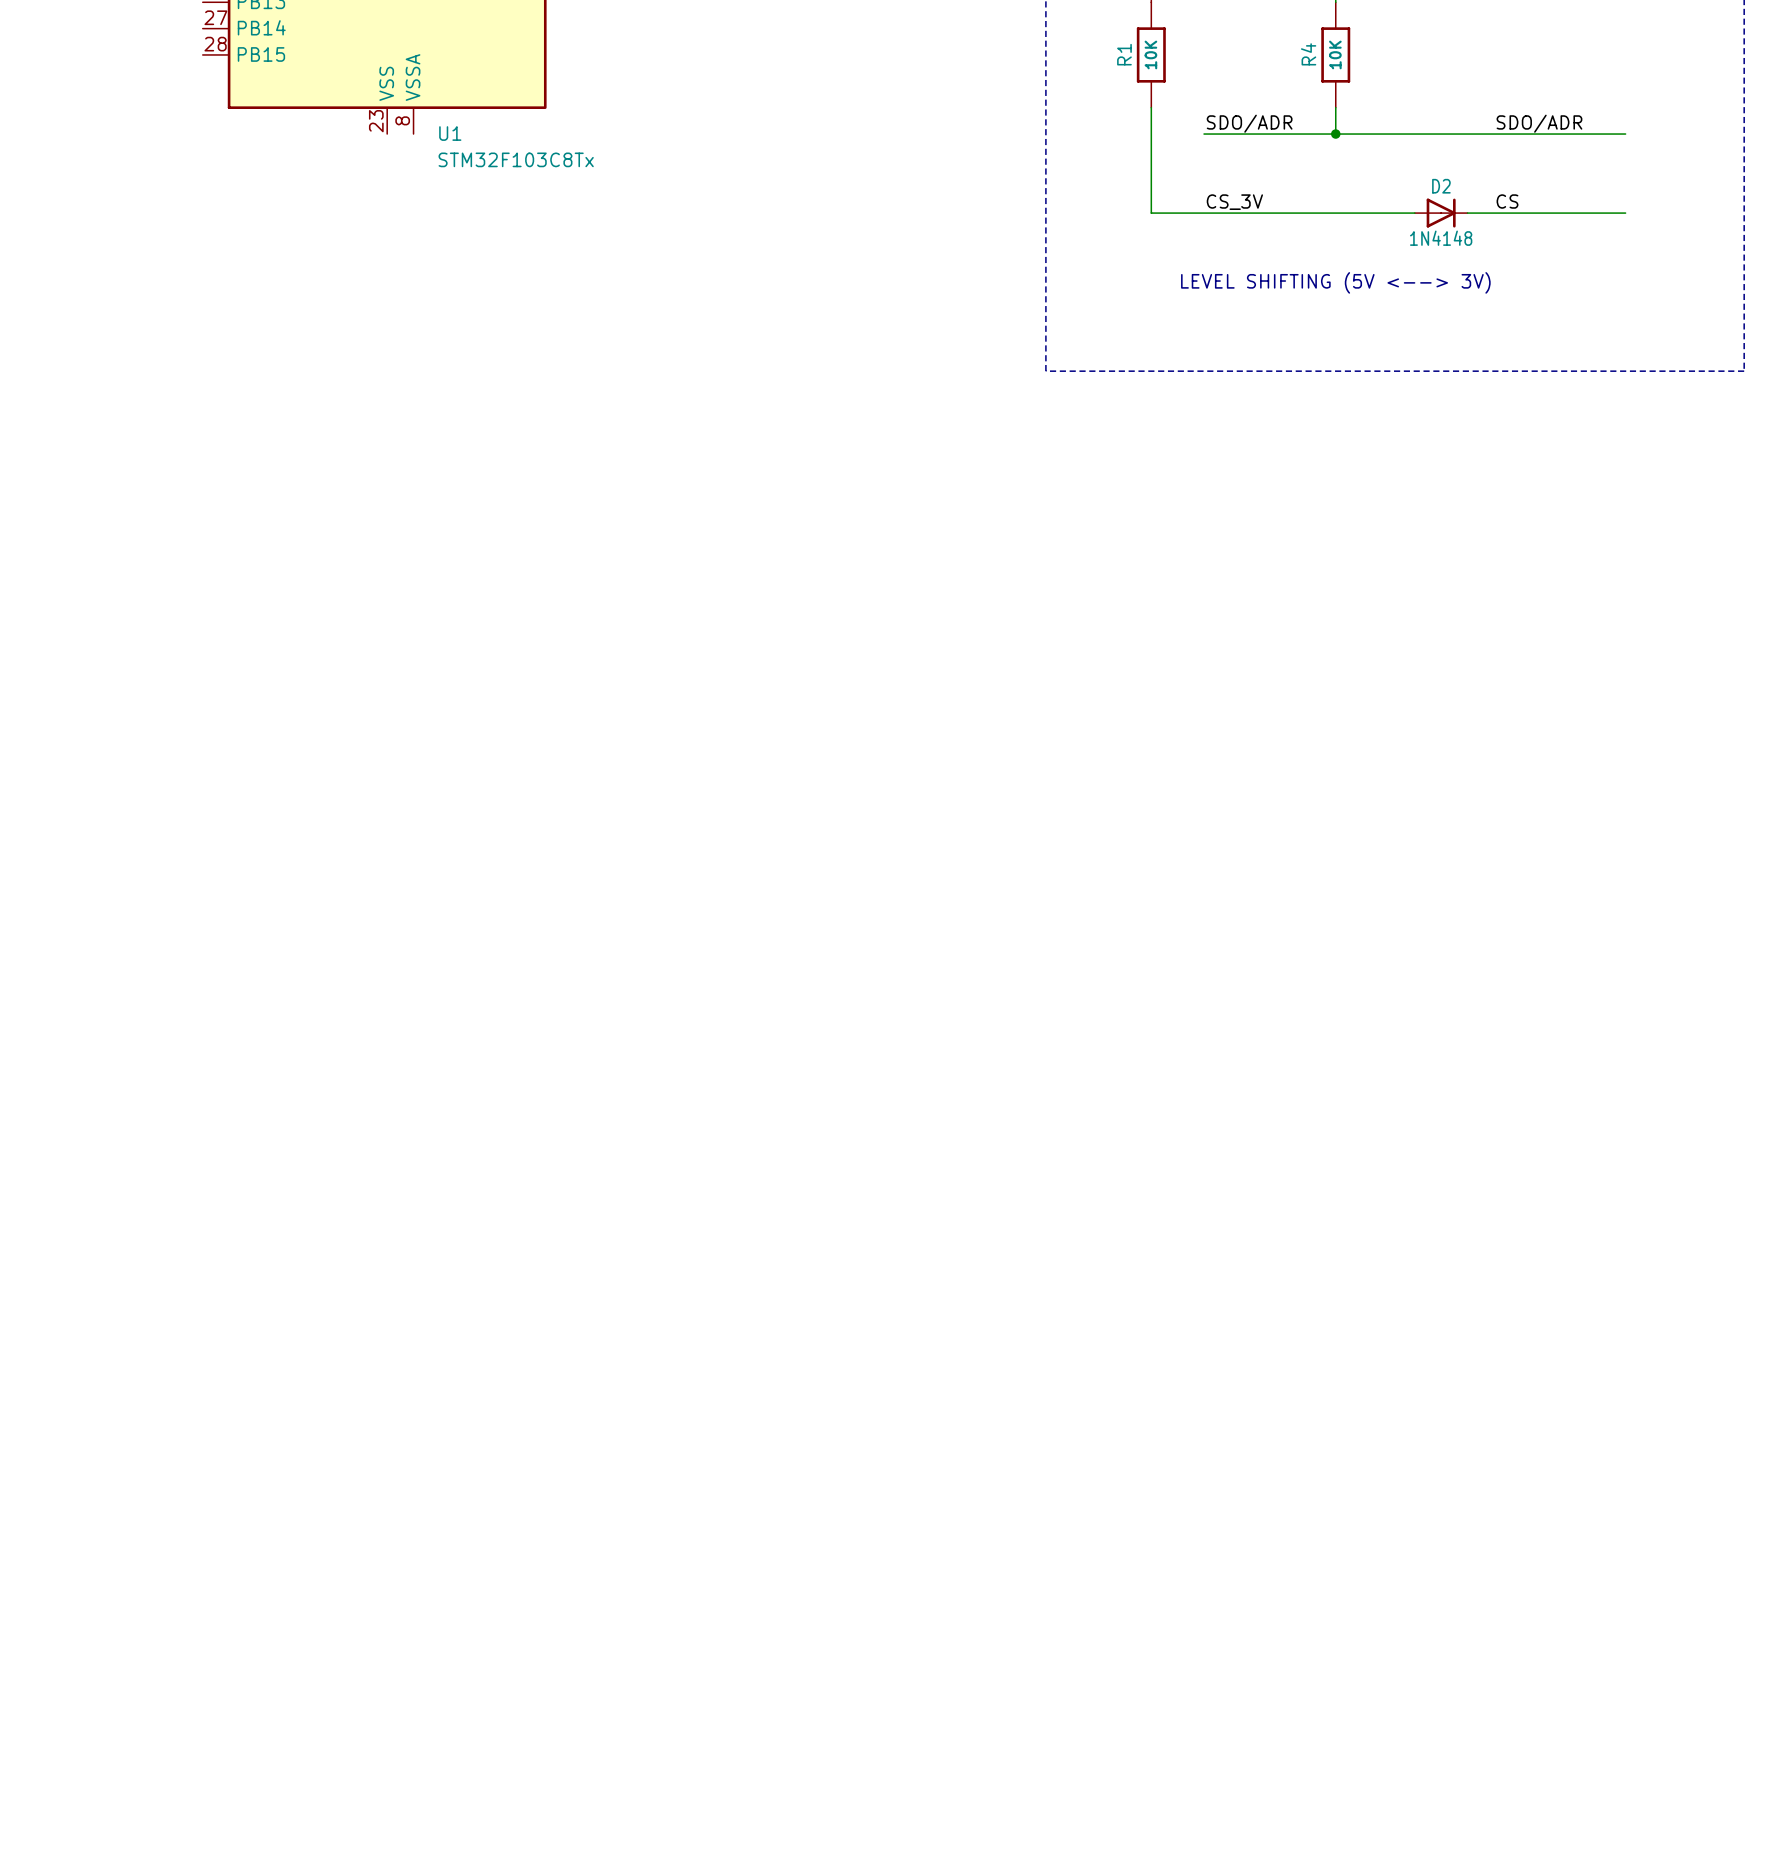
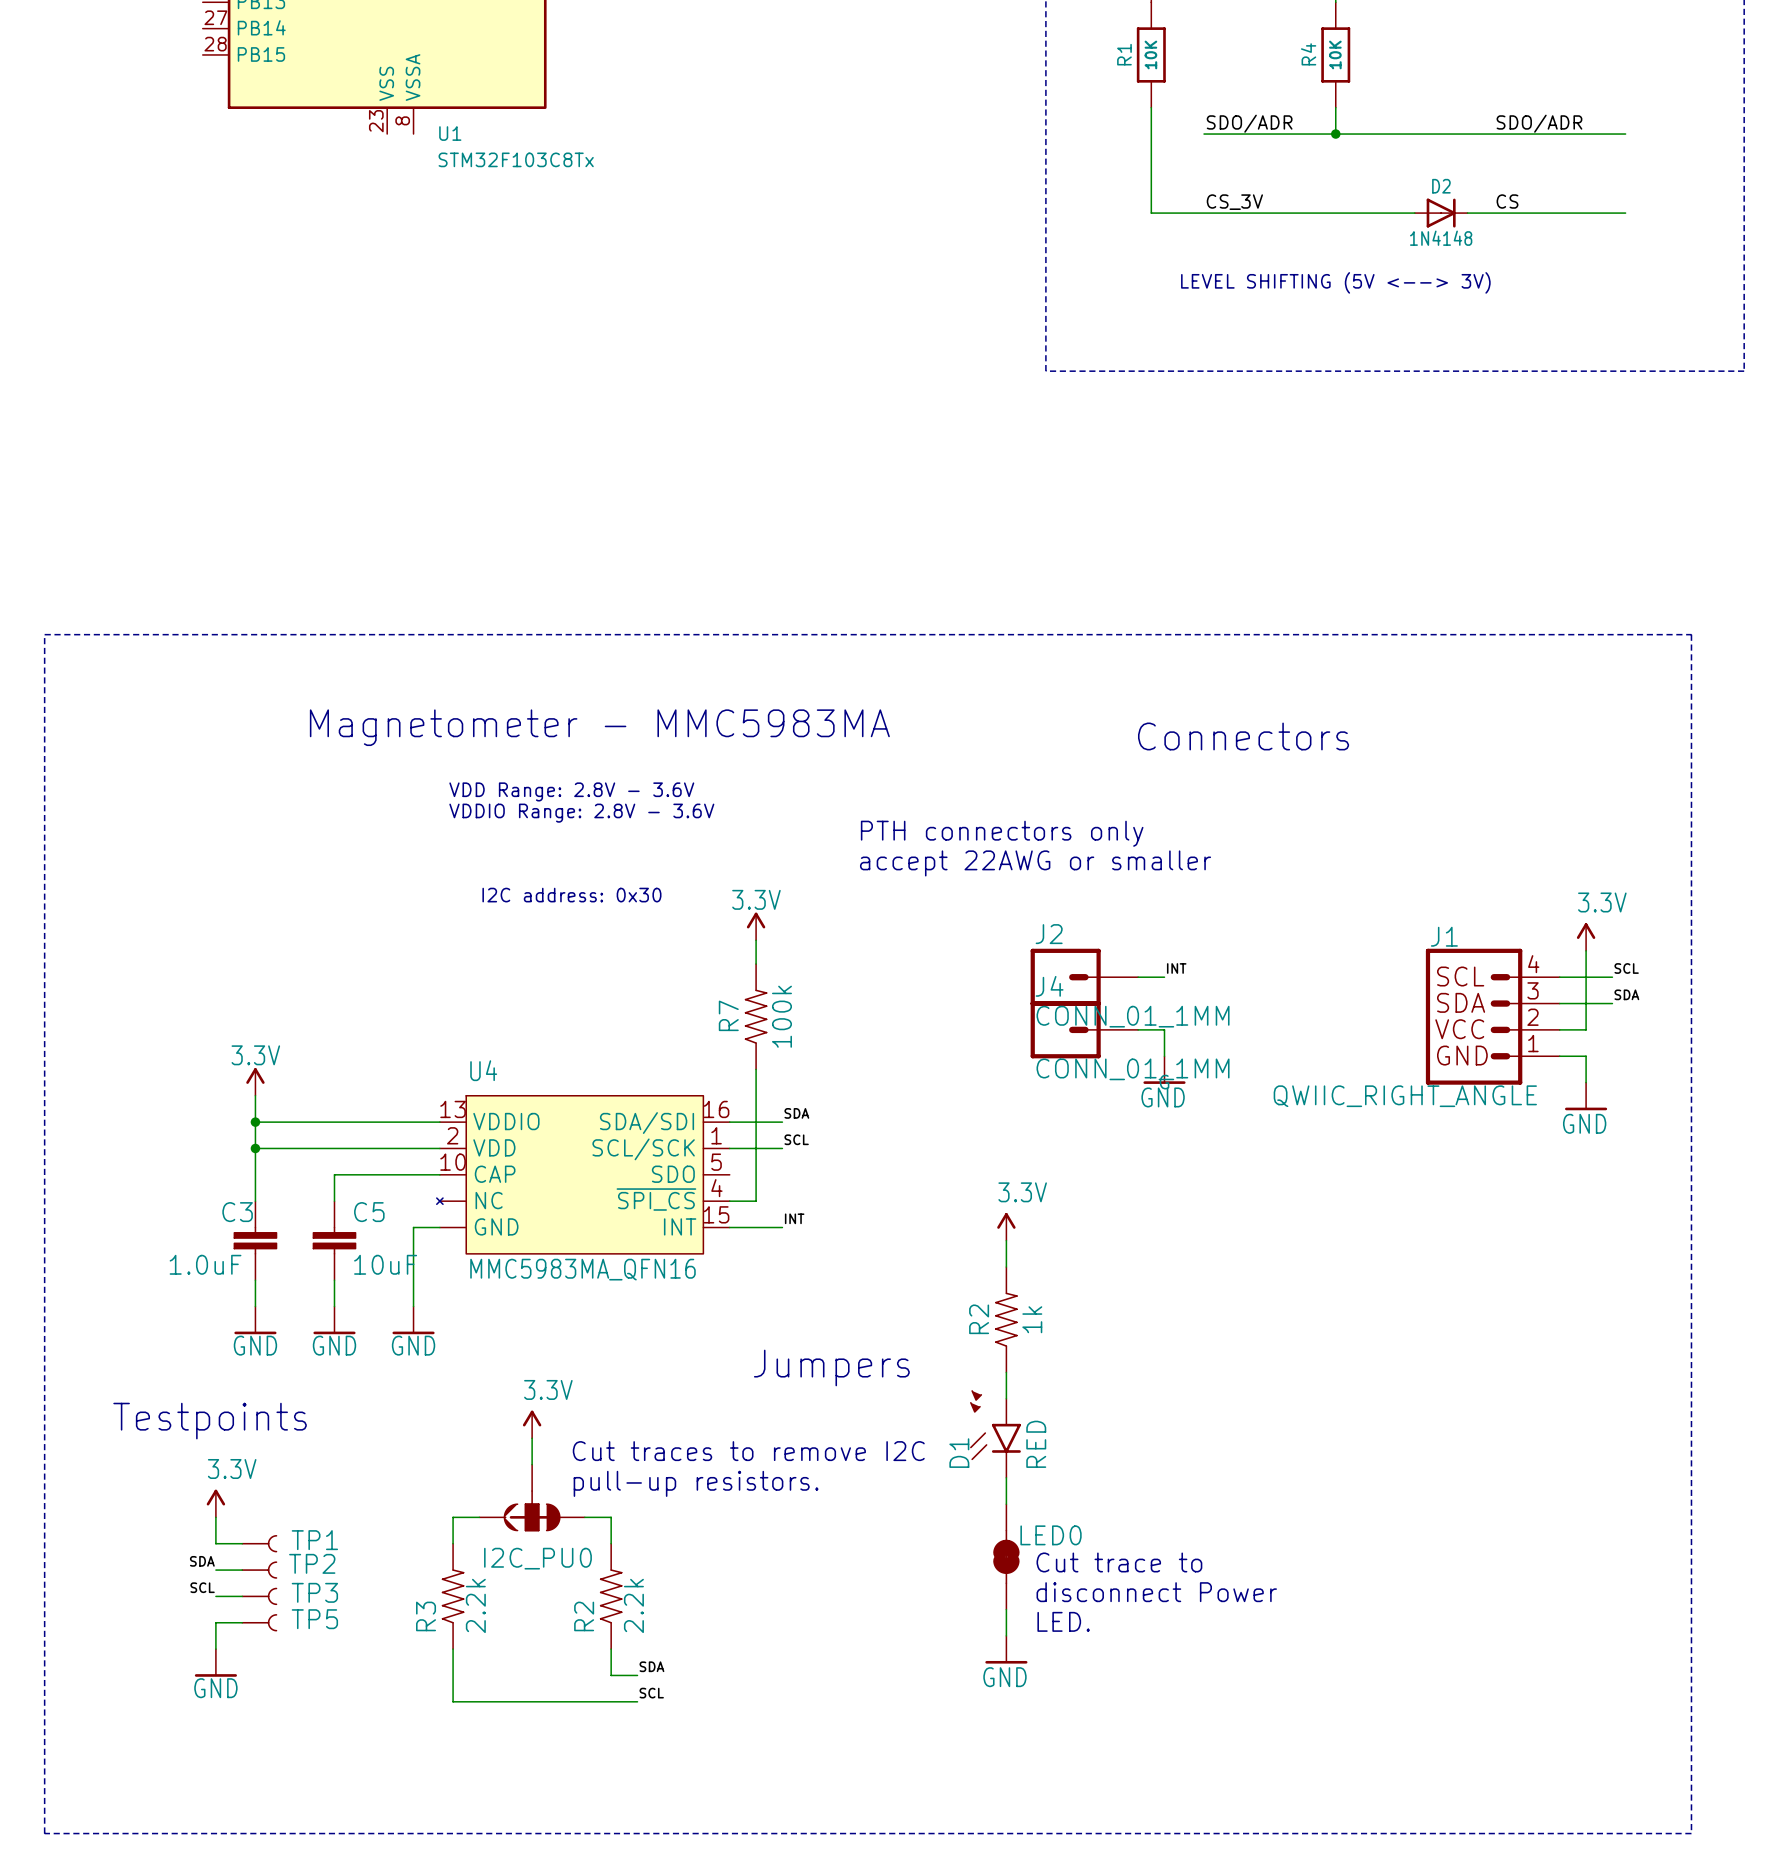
line: none -> (44, 634) (1691, 634) (1691, 1833) (44, 1833) (44, 634)
text: none -> Magnetometer - MMC5983MA (599, 727)
text: none -> Connectors (1243, 736)
text: none -> VDD Range: 2.8V - 3.6V (571, 791)
text: none -> VDDIO Range: 2.8V - 3.6V (581, 813)
text: none -> PTH connectors only (1002, 833)
text: none -> accept 22AWG or smaller (1035, 863)
text: none -> I2C address: 0x30 (571, 895)
power symbol: none -> 3.3V (756, 926)
power symbol: none -> 3.3V (1586, 937)
wire: none -> (756, 940) (756, 964)
wire: none -> (1586, 950) (1586, 1029) (1559, 1029)
label: none -> INT (1176, 968)
label: none -> SCL (1626, 968)
J2: none -> CONN_01_1MM (1084, 977)
wire: none -> (1138, 977) (1164, 977)
wire: none -> (1559, 977) (1612, 977)
label: none -> SDA (1626, 994)
wire: none -> (1559, 1003) (1612, 1003)
R7: none -> 100k (756, 1016)
J1: none -> QWIIC_RIGHT_ANGLE (1492, 1016)
J4: none -> CONN_01_1MM (1084, 1029)
wire: none -> (1138, 1029) (1164, 1029) (1164, 1056)
wire: none -> (1559, 1056) (1586, 1056) (1586, 1082)
wire: none -> (756, 1069) (756, 1201) (729, 1201)
power symbol: none -> GND (1164, 1070)
power symbol: none -> 3.3V (255, 1081)
wire: none -> (255, 1095) (255, 1201)
power symbol: none -> GND (1586, 1096)
label: none -> SDA (796, 1113)
wire: none -> (255, 1122) (439, 1122)
junction: none -> (255, 1122)
wire: none -> (729, 1122) (782, 1122)
label: none -> SCL (796, 1139)
wire: none -> (255, 1148) (439, 1148)
junction: none -> (255, 1148)
wire: none -> (729, 1148) (782, 1148)
wire: none -> (439, 1174) (334, 1174) (334, 1201)
U4: none -> MMC5983MA_QFN16 (583, 1174)
label: none -> INT (794, 1218)
power symbol: none -> 3.3V (1006, 1226)
wire: none -> (439, 1227) (413, 1227) (413, 1306)
wire: none -> (729, 1227) (782, 1227)
C3: none -> 1.0uF (255, 1240)
C5: none -> 10uF (334, 1240)
wire: none -> (1006, 1240) (1006, 1267)
wire: none -> (255, 1280) (255, 1306)
wire: none -> (334, 1280) (334, 1306)
R2: none -> 1k (1006, 1319)
power symbol: none -> GND (255, 1320)
power symbol: none -> GND (334, 1320)
power symbol: none -> GND (413, 1320)
text: none -> Jumpers (831, 1367)
wire: none -> (1006, 1372) (1006, 1398)
text: none -> Testpoints (210, 1421)
power symbol: none -> 3.3V (532, 1424)
D1: none -> RED (995, 1433)
wire: none -> (532, 1438) (532, 1464)
text: none -> Cut traces to remove I2C (748, 1451)
wire: none -> (1006, 1477) (1006, 1504)
text: none -> pull-up resistors. (696, 1483)
I2C_PU0: none -> (532, 1497)
power symbol: none -> 3.3V (215, 1503)
wire: none -> (215, 1517) (215, 1543) (242, 1543)
wire: none -> (479, 1517) (453, 1517) (453, 1543)
wire: none -> (584, 1517) (611, 1517) (611, 1543)
TP1: none -> (259, 1543)
LED0: none -> (1006, 1556)
label: none -> SDA (202, 1561)
text: none -> Cut trace to (1119, 1562)
wire: none -> (215, 1570) (242, 1570)
TP2: none -> (259, 1570)
label: none -> SCL (202, 1587)
text: none -> disconnect Power (1156, 1592)
wire: none -> (215, 1596) (242, 1596)
TP3: none -> (259, 1596)
R3: none -> 2.2k (453, 1596)
R2: none -> 2.2k (611, 1596)
wire: none -> (1006, 1609) (1006, 1635)
text: none -> LED. (1063, 1621)
wire: none -> (242, 1622) (215, 1622) (215, 1649)
TP5: none -> (259, 1622)
wire: none -> (453, 1649) (453, 1701) (637, 1701)
wire: none -> (611, 1649) (611, 1675) (637, 1675)
power symbol: none -> GND (1006, 1649)
power symbol: none -> GND (215, 1662)
label: none -> SDA (651, 1666)
label: none -> SCL (651, 1693)

